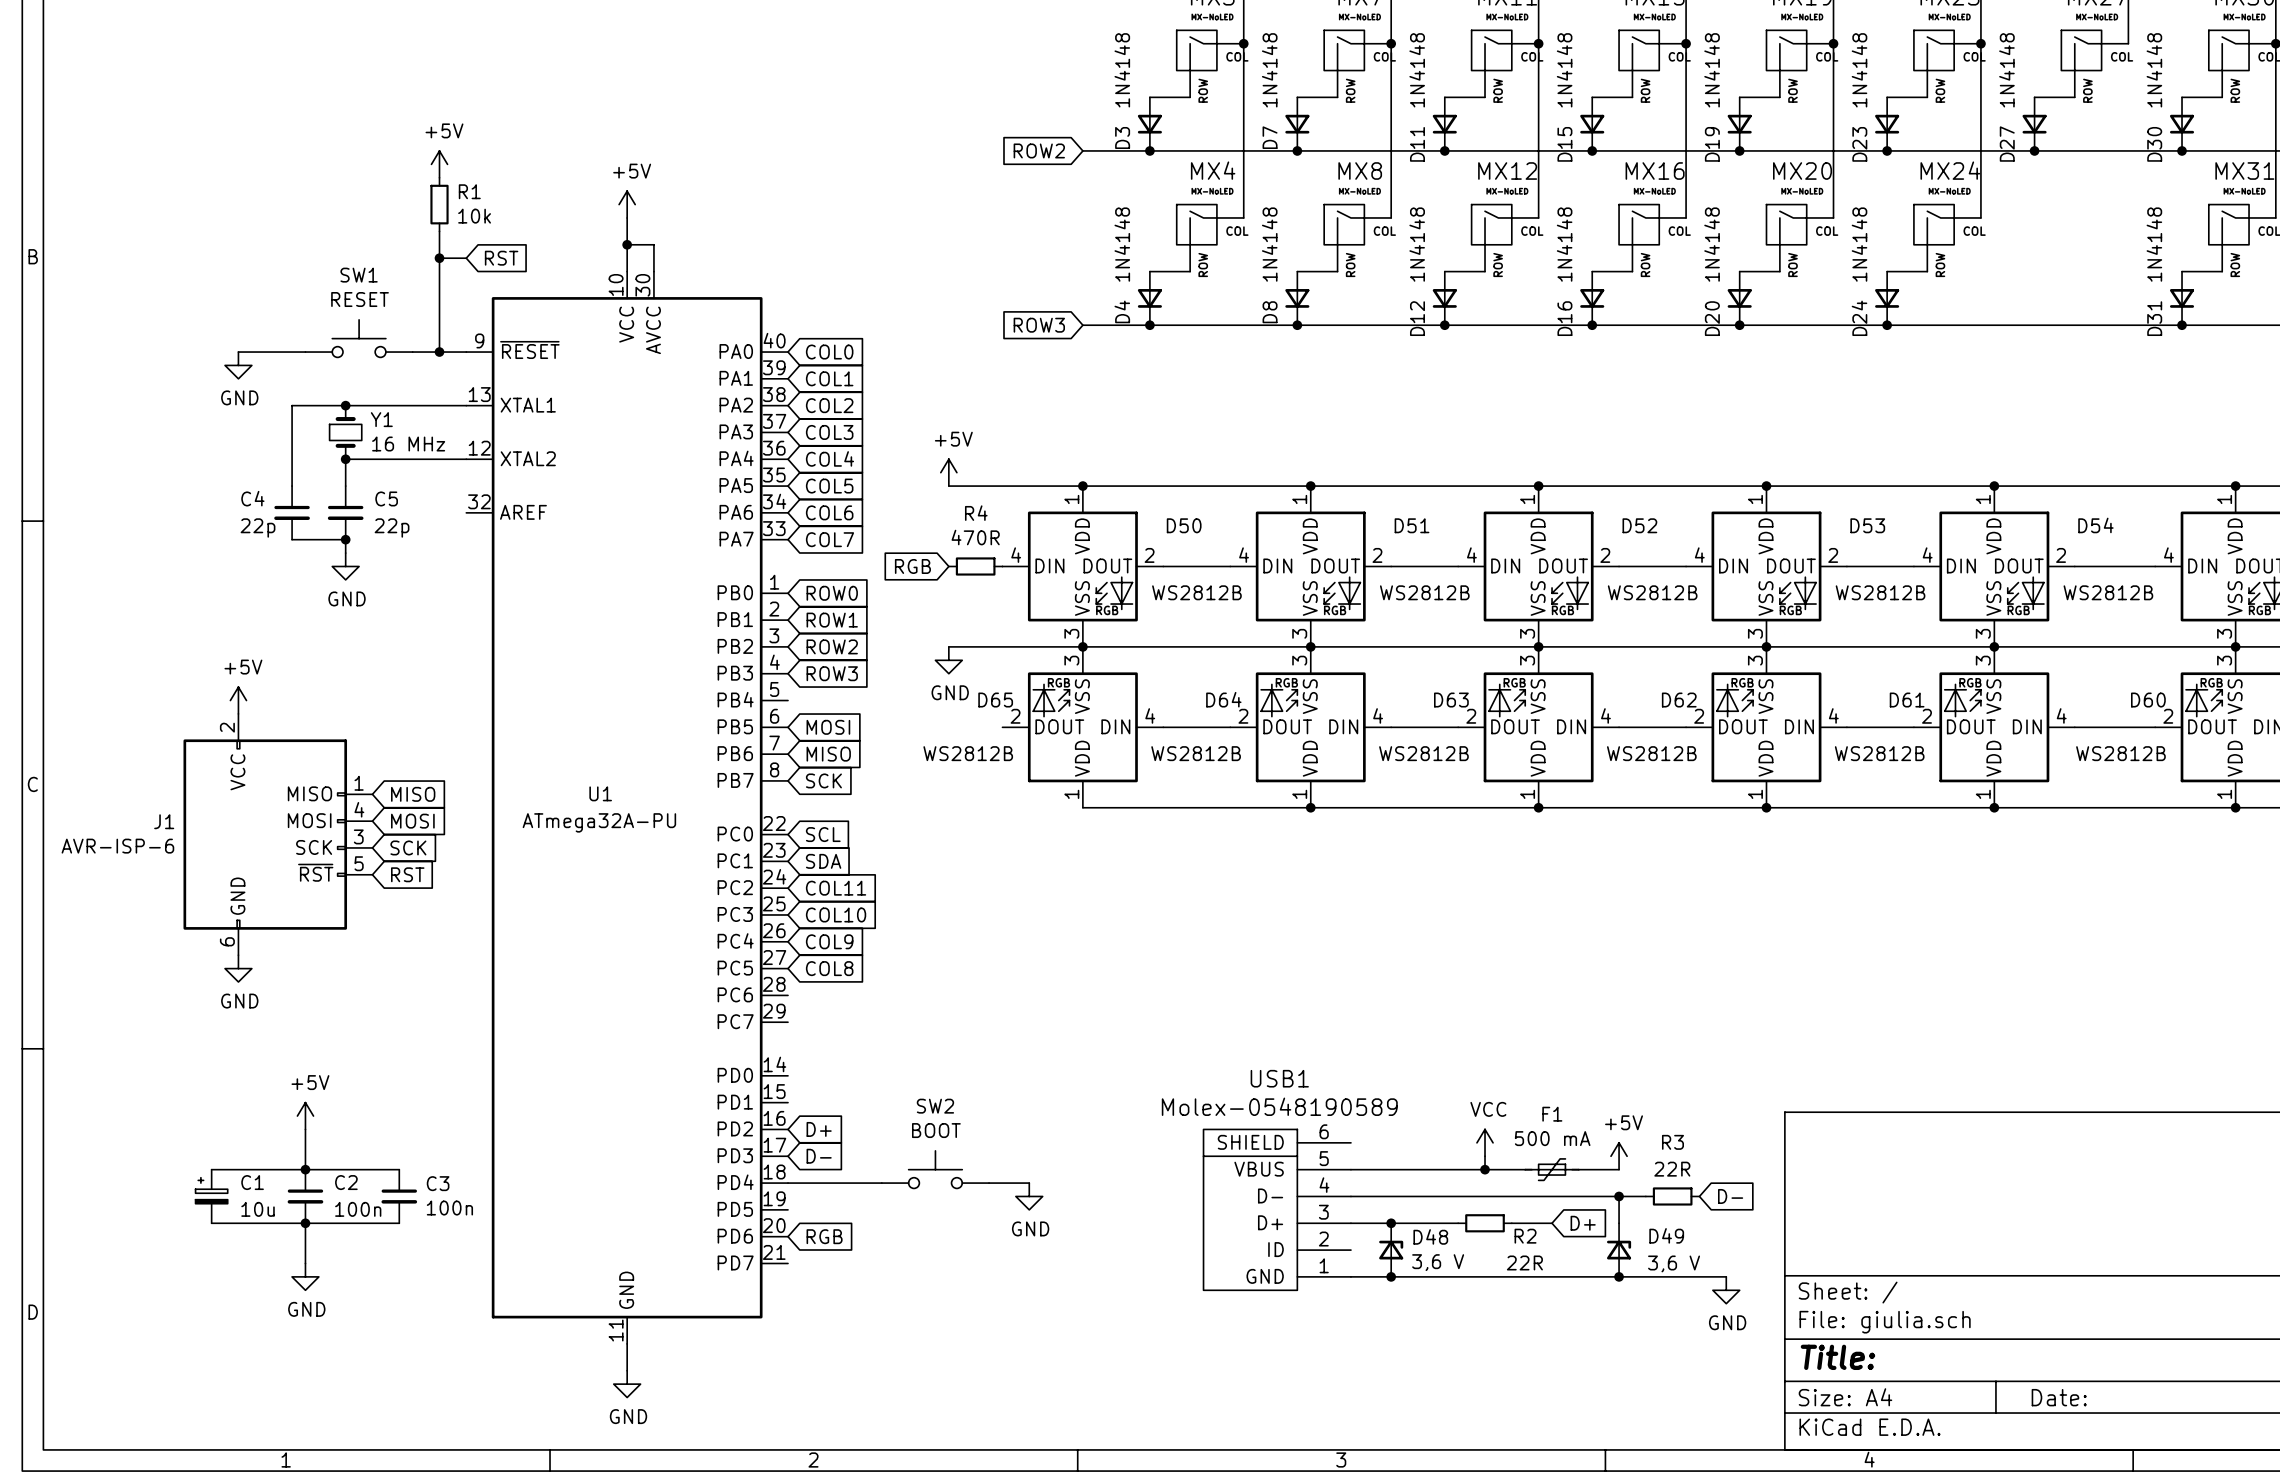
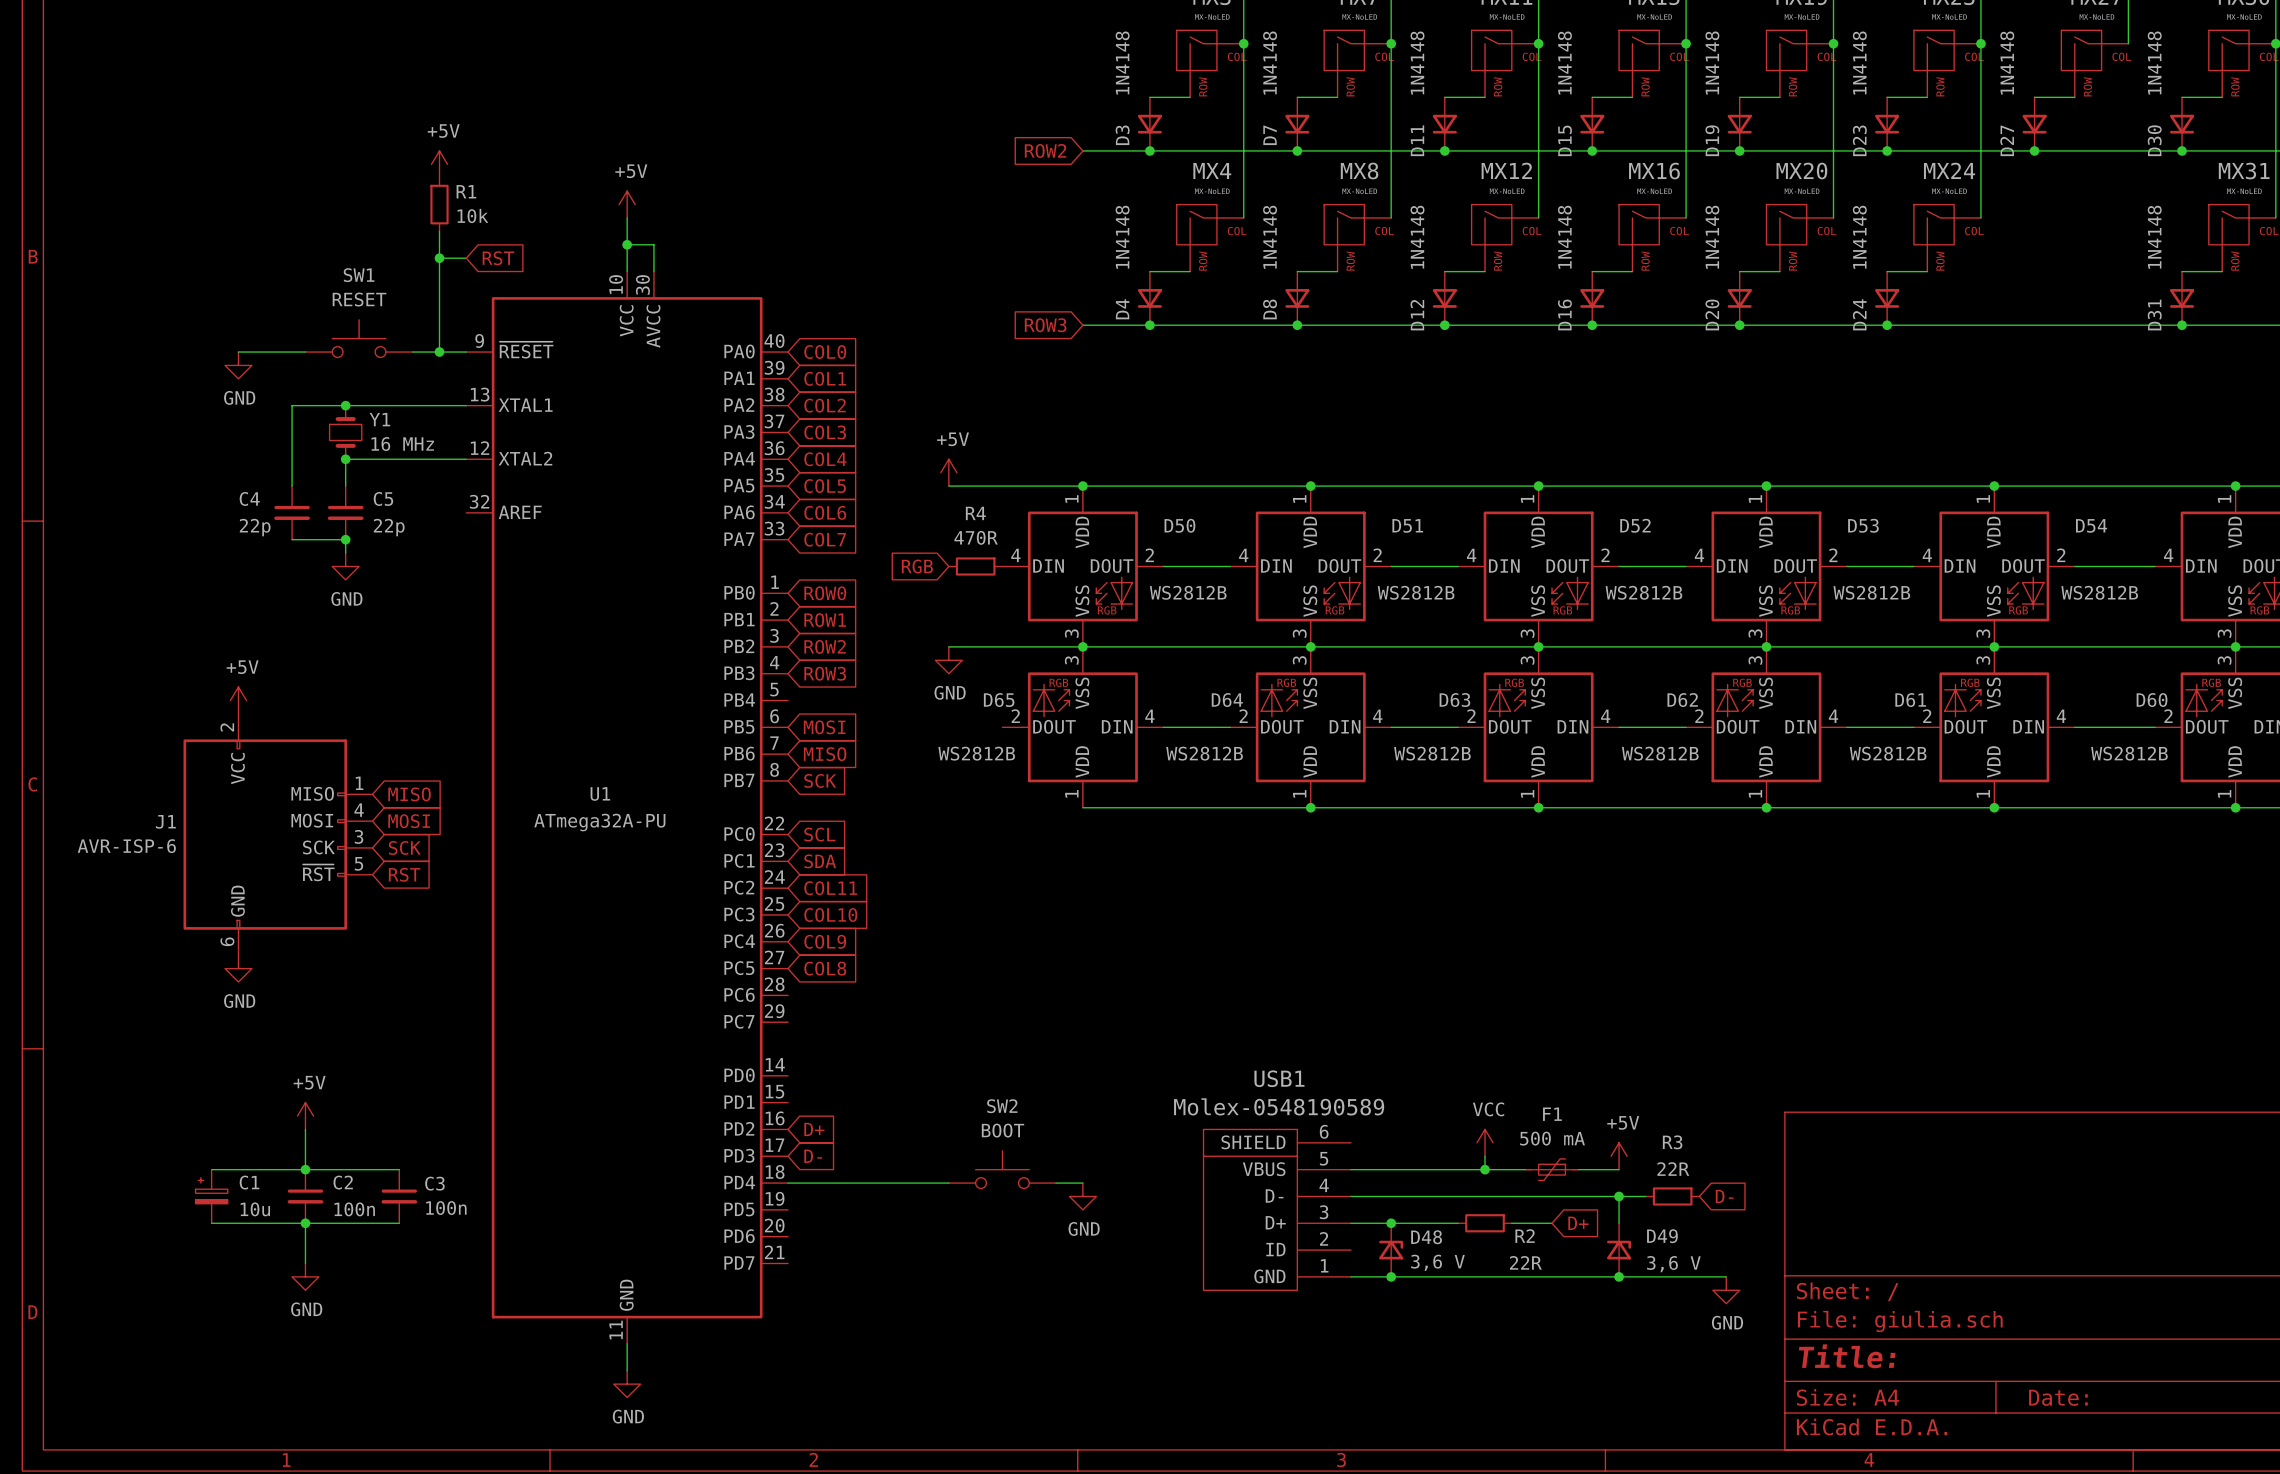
SW2 position: (935, 1169) -> (1002, 1169)
wire: none -> (881, 1183) (948, 1183)
wire: (989, 1183) (1029, 1183) -> none
wire: none -> (1056, 1183) (1082, 1183)
power symbol position: GND (1029, 1196) -> GND (1082, 1196)
global label: RGB (824, 1236) -> none

